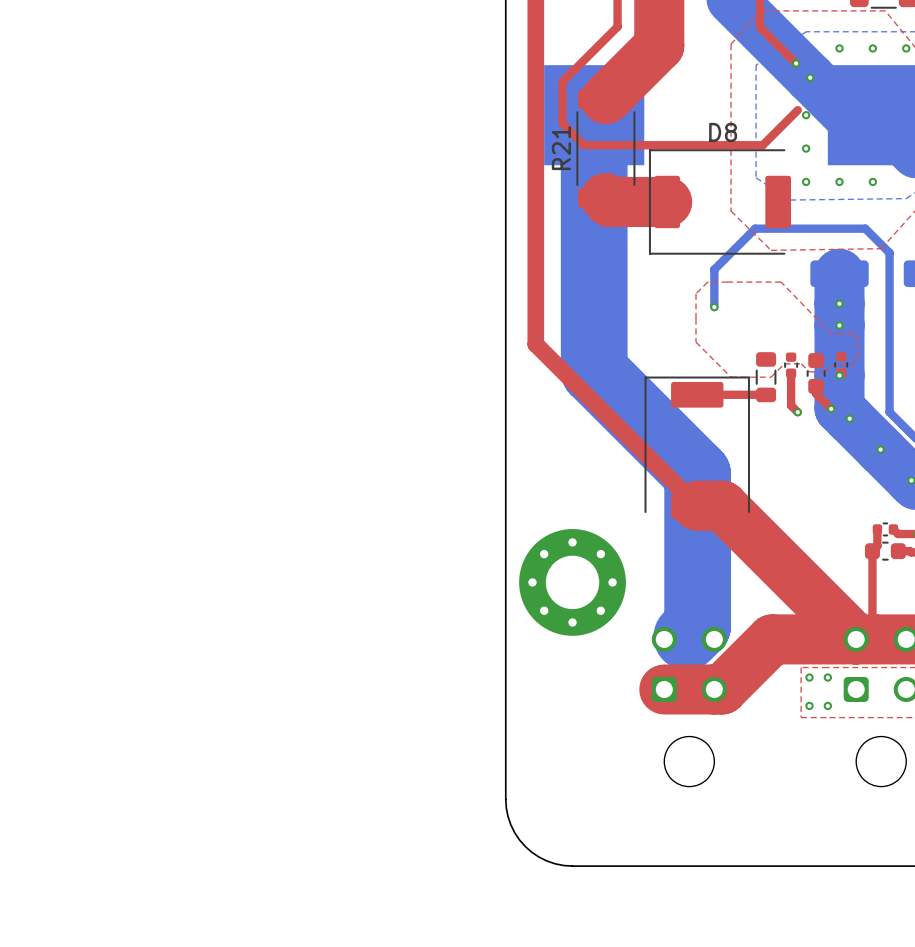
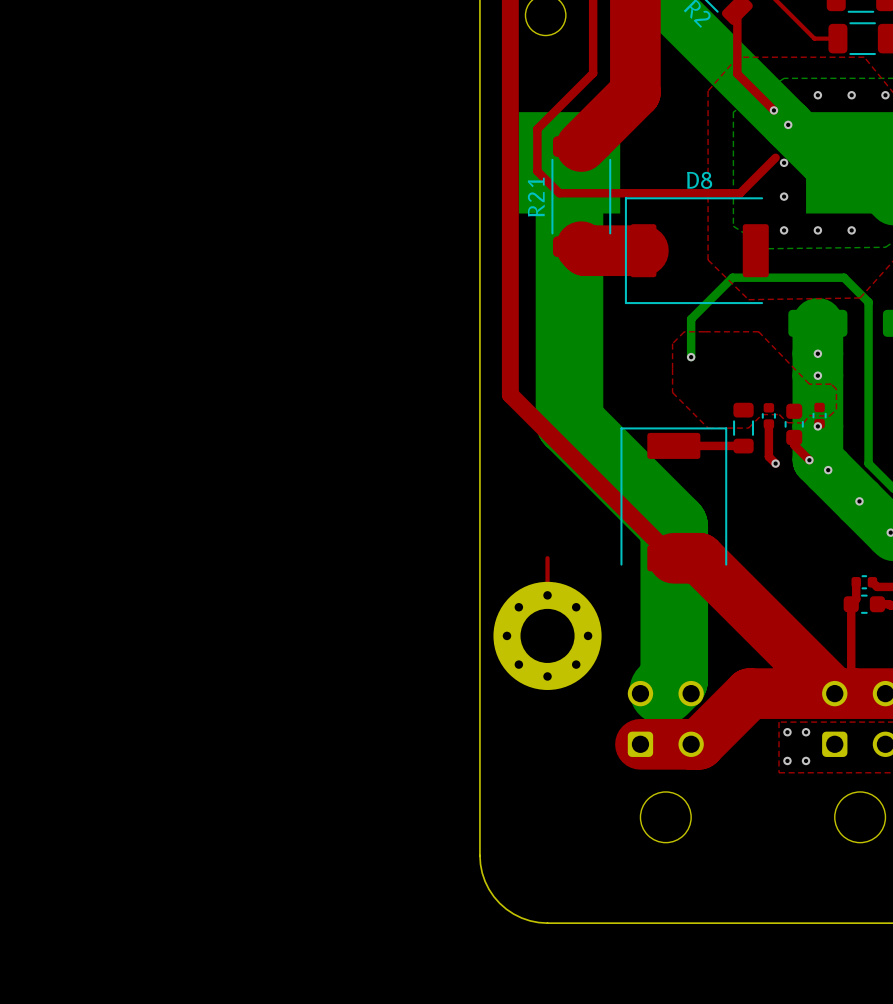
top track: none -> (547, 558) (547, 595)

